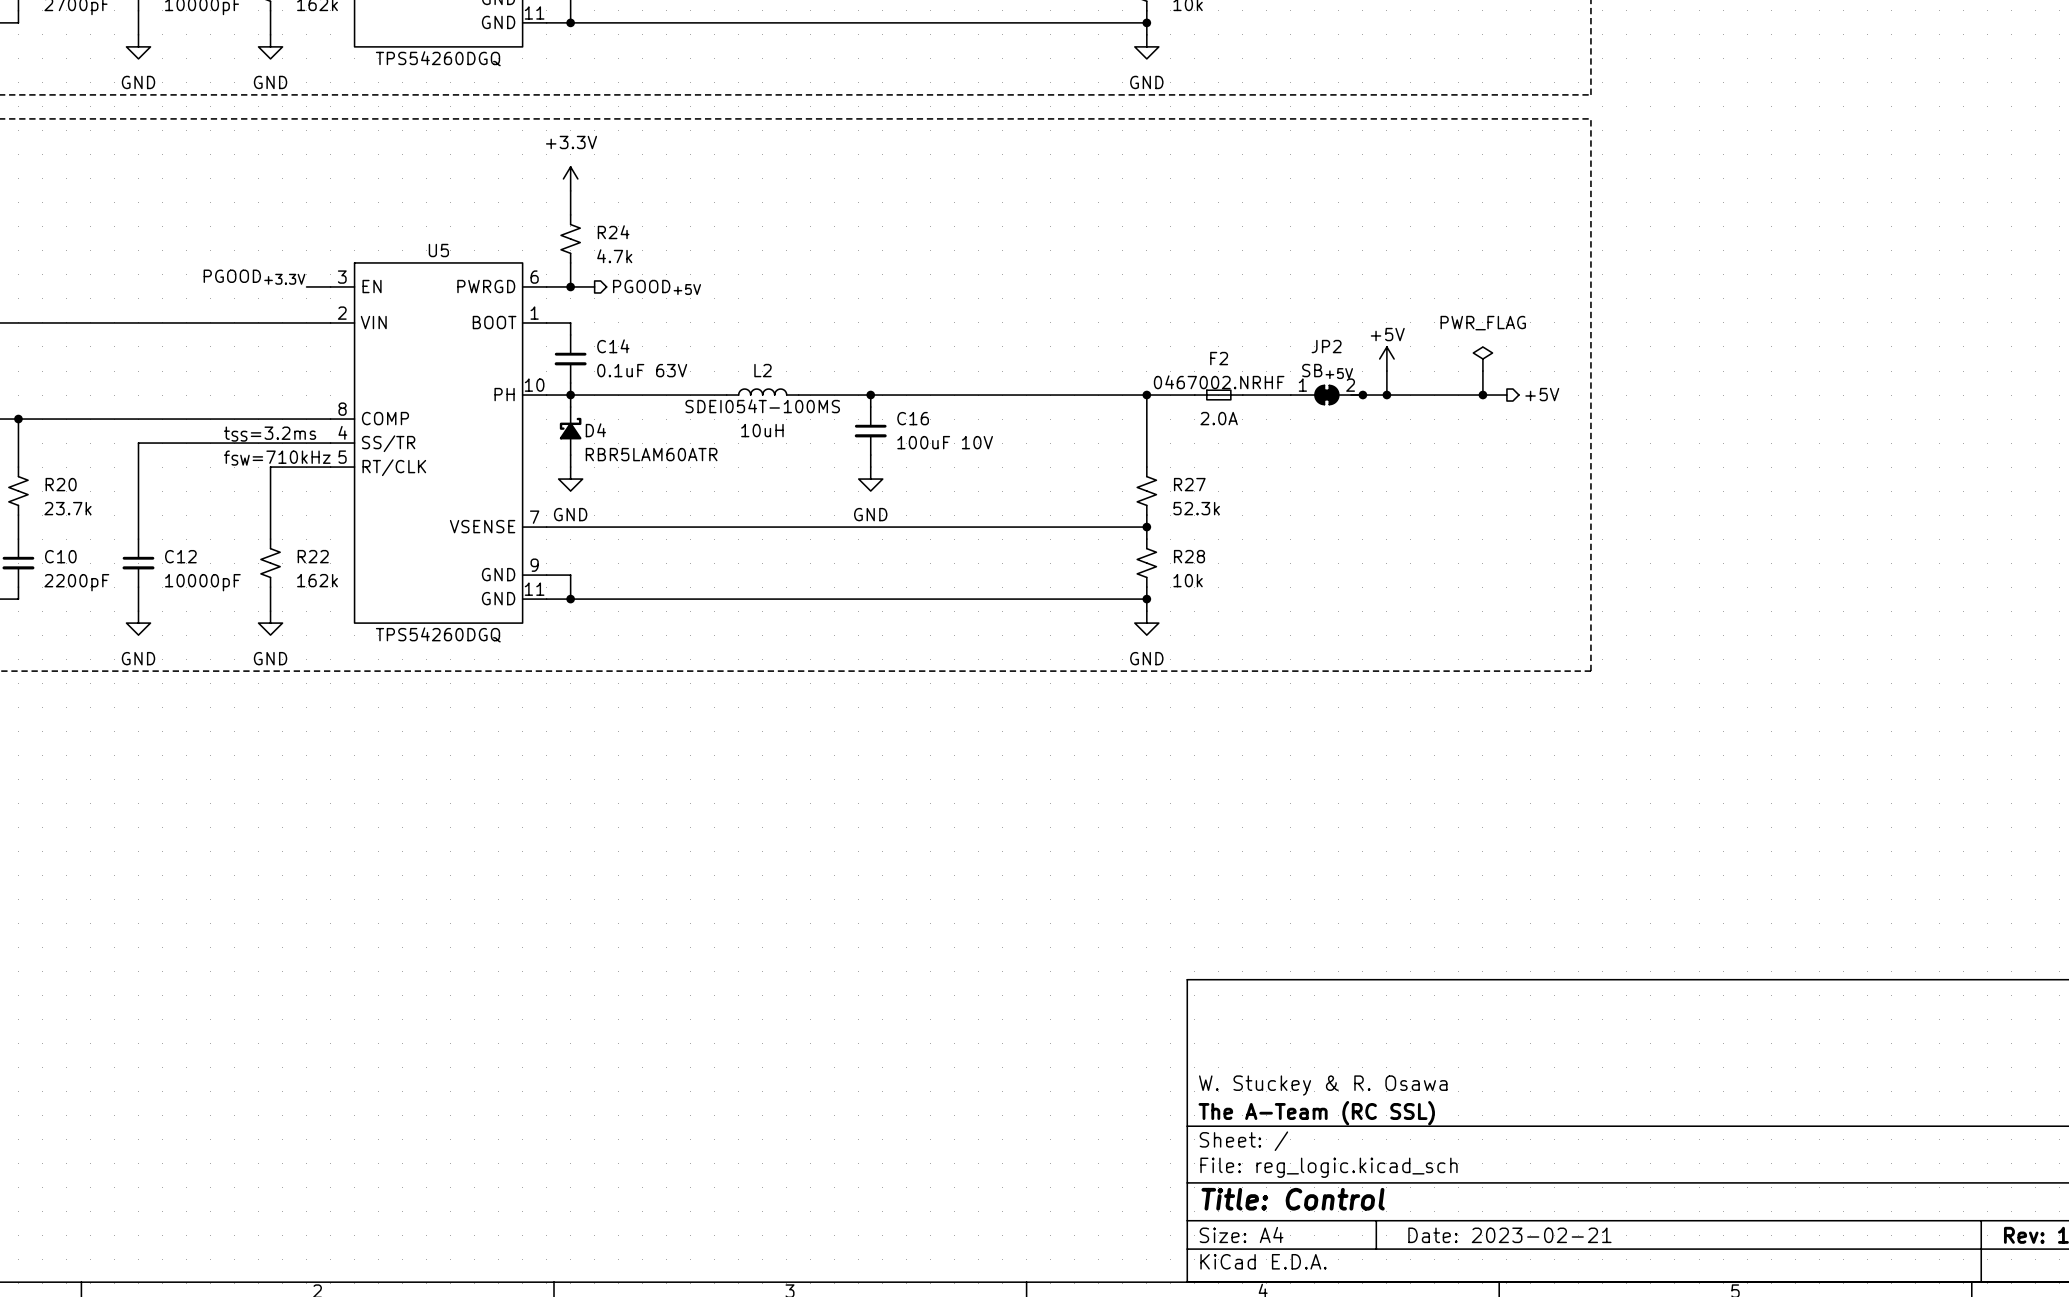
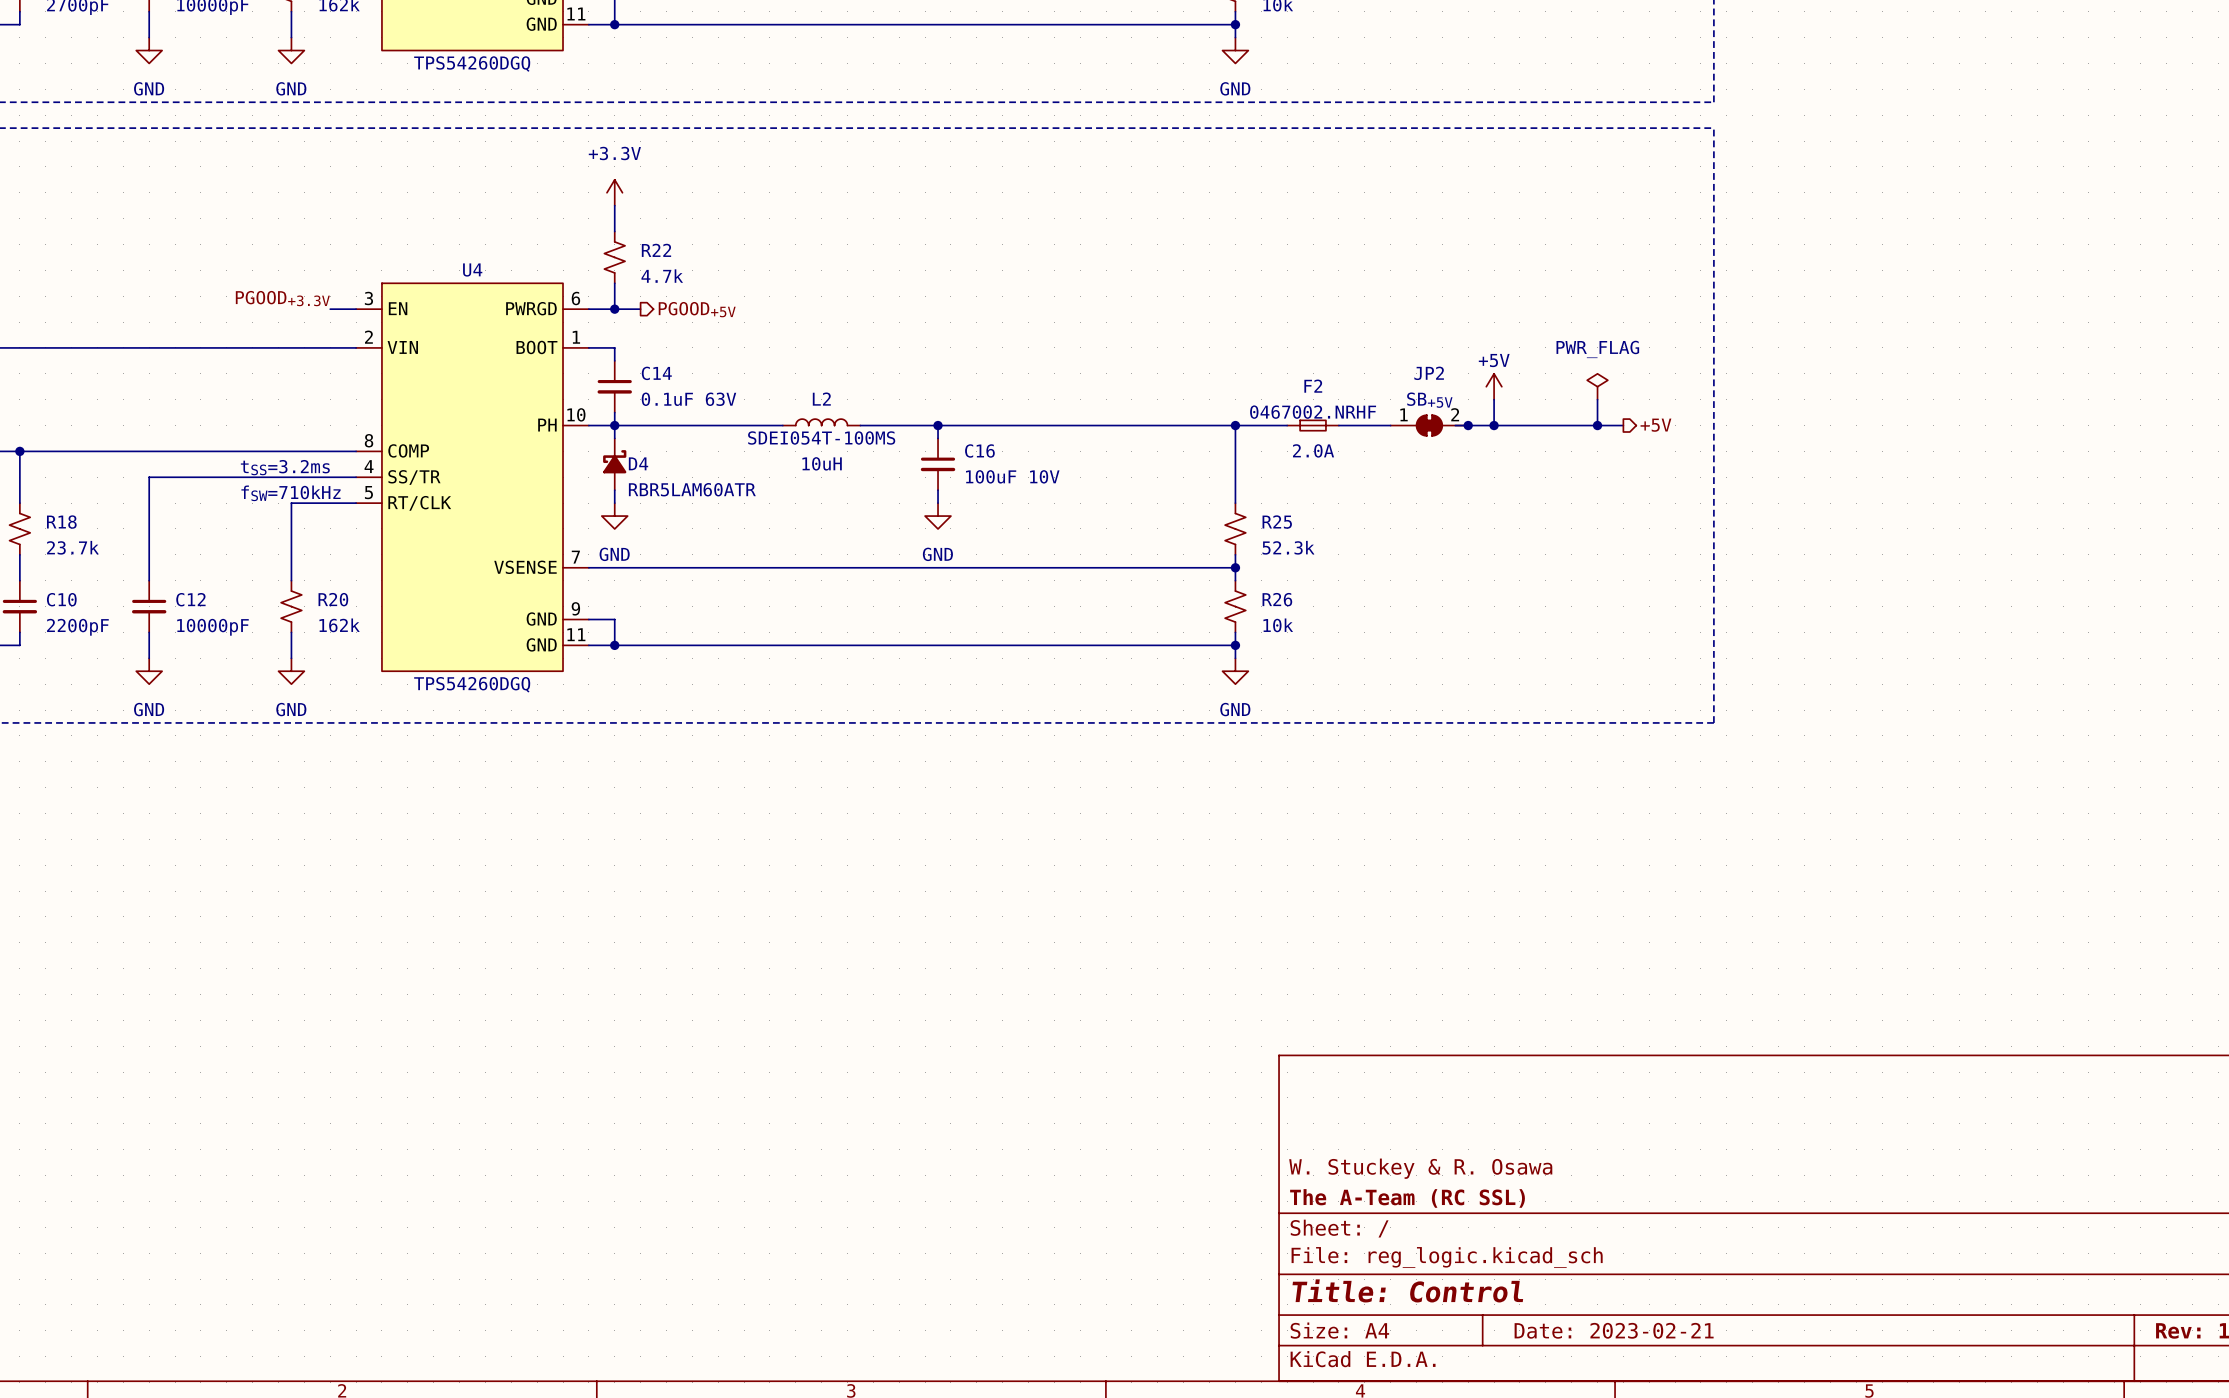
R24 name: R24 (613, 232) -> R22 (656, 250)
U5 name: U5 (438, 250) -> U4 (472, 270)
R20 name: R20 (61, 484) -> R18 (61, 522)
R27 name: R27 (1189, 484) -> R25 (1277, 522)
R22 name: R22 (313, 556) -> R20 (333, 599)
R28 name: R28 (1189, 556) -> R26 (1277, 599)

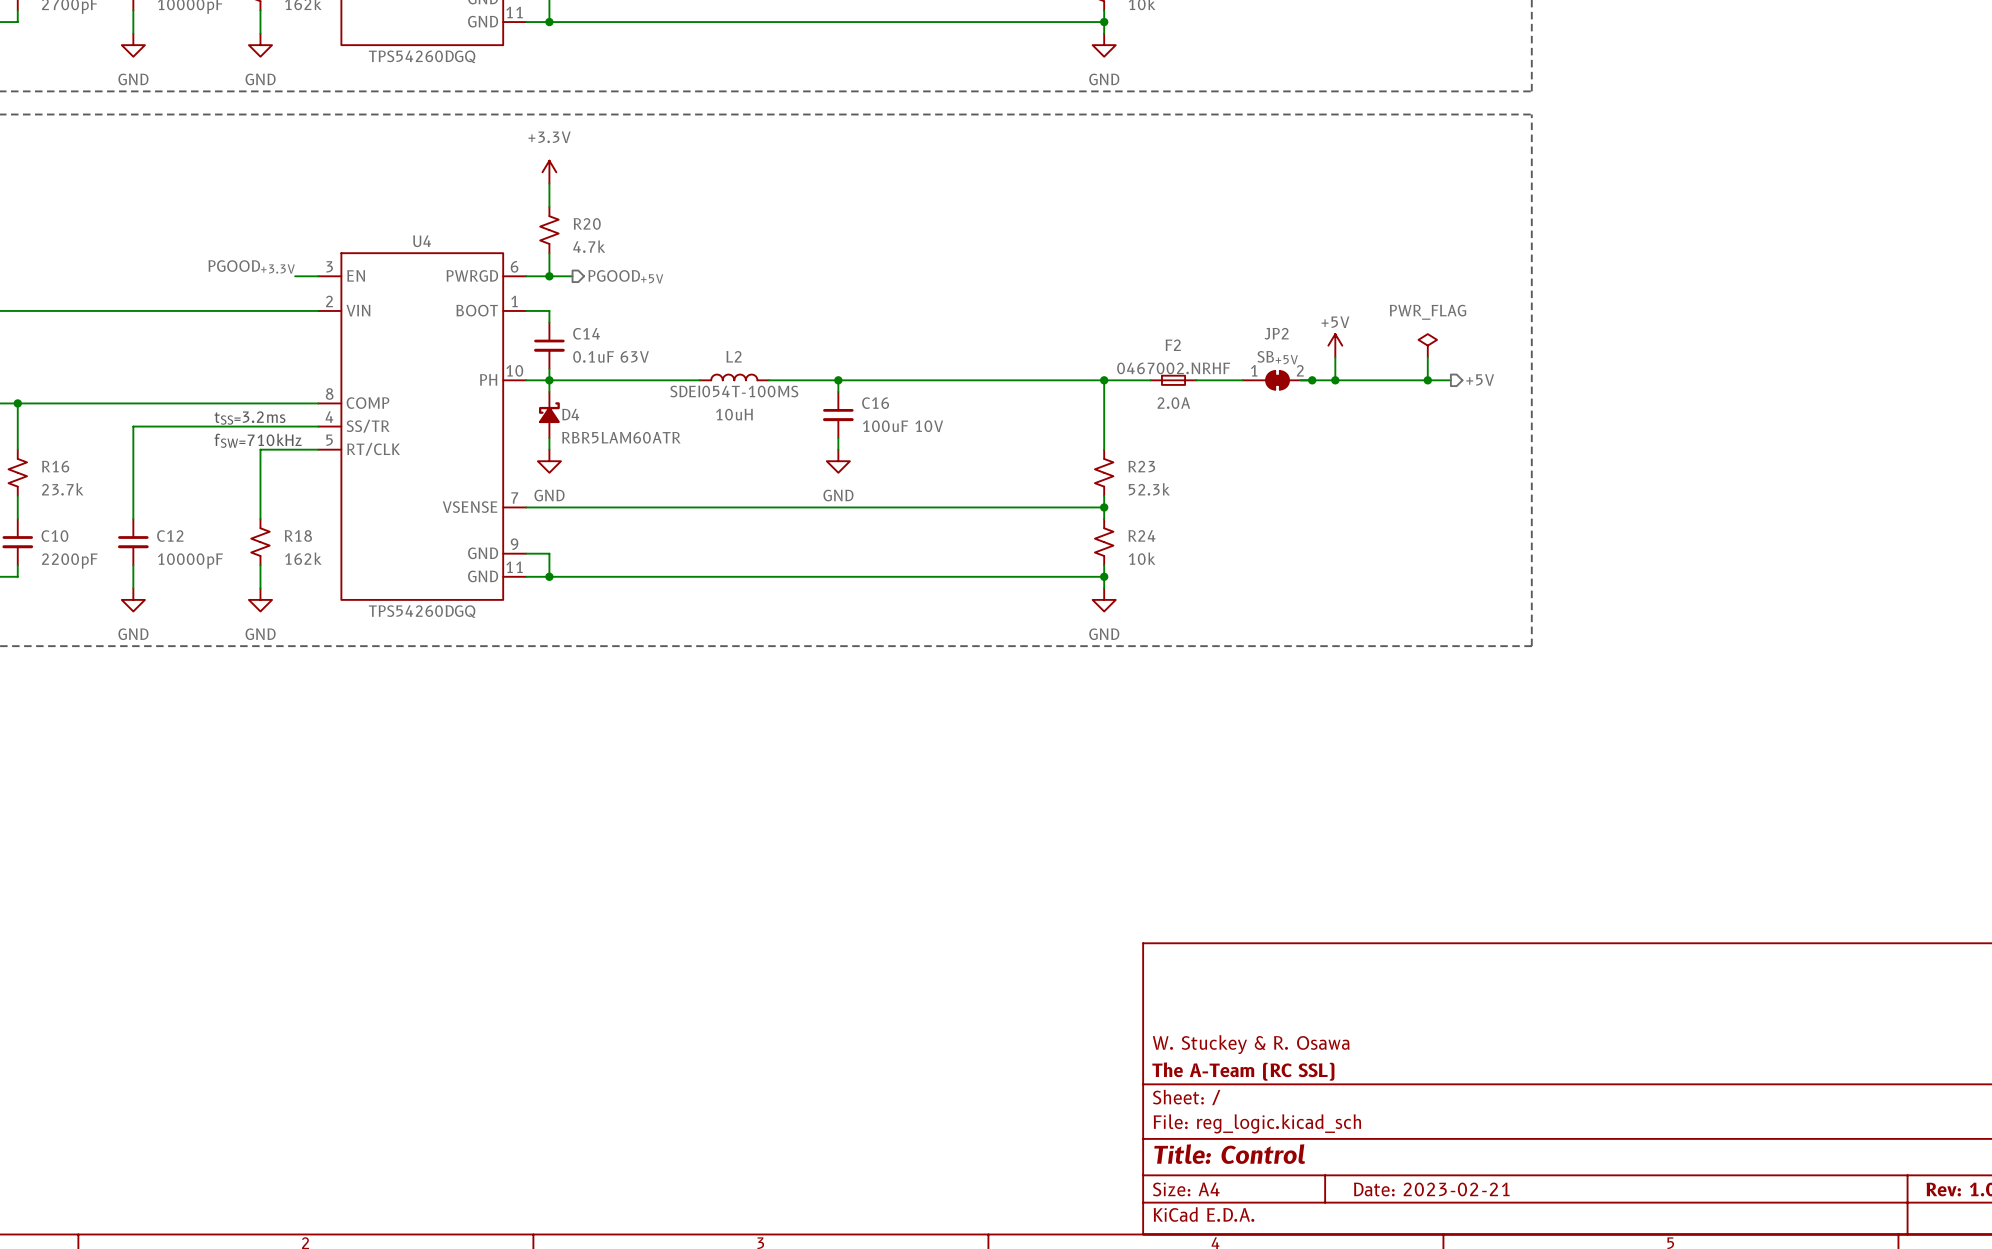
R22 name: R22 (656, 250) -> R20 (587, 223)
R18 name: R18 (61, 522) -> R16 (55, 466)
R25 name: R25 (1277, 522) -> R23 (1141, 466)
R20 name: R20 (333, 599) -> R18 (298, 535)
R26 name: R26 (1277, 599) -> R24 (1141, 535)

